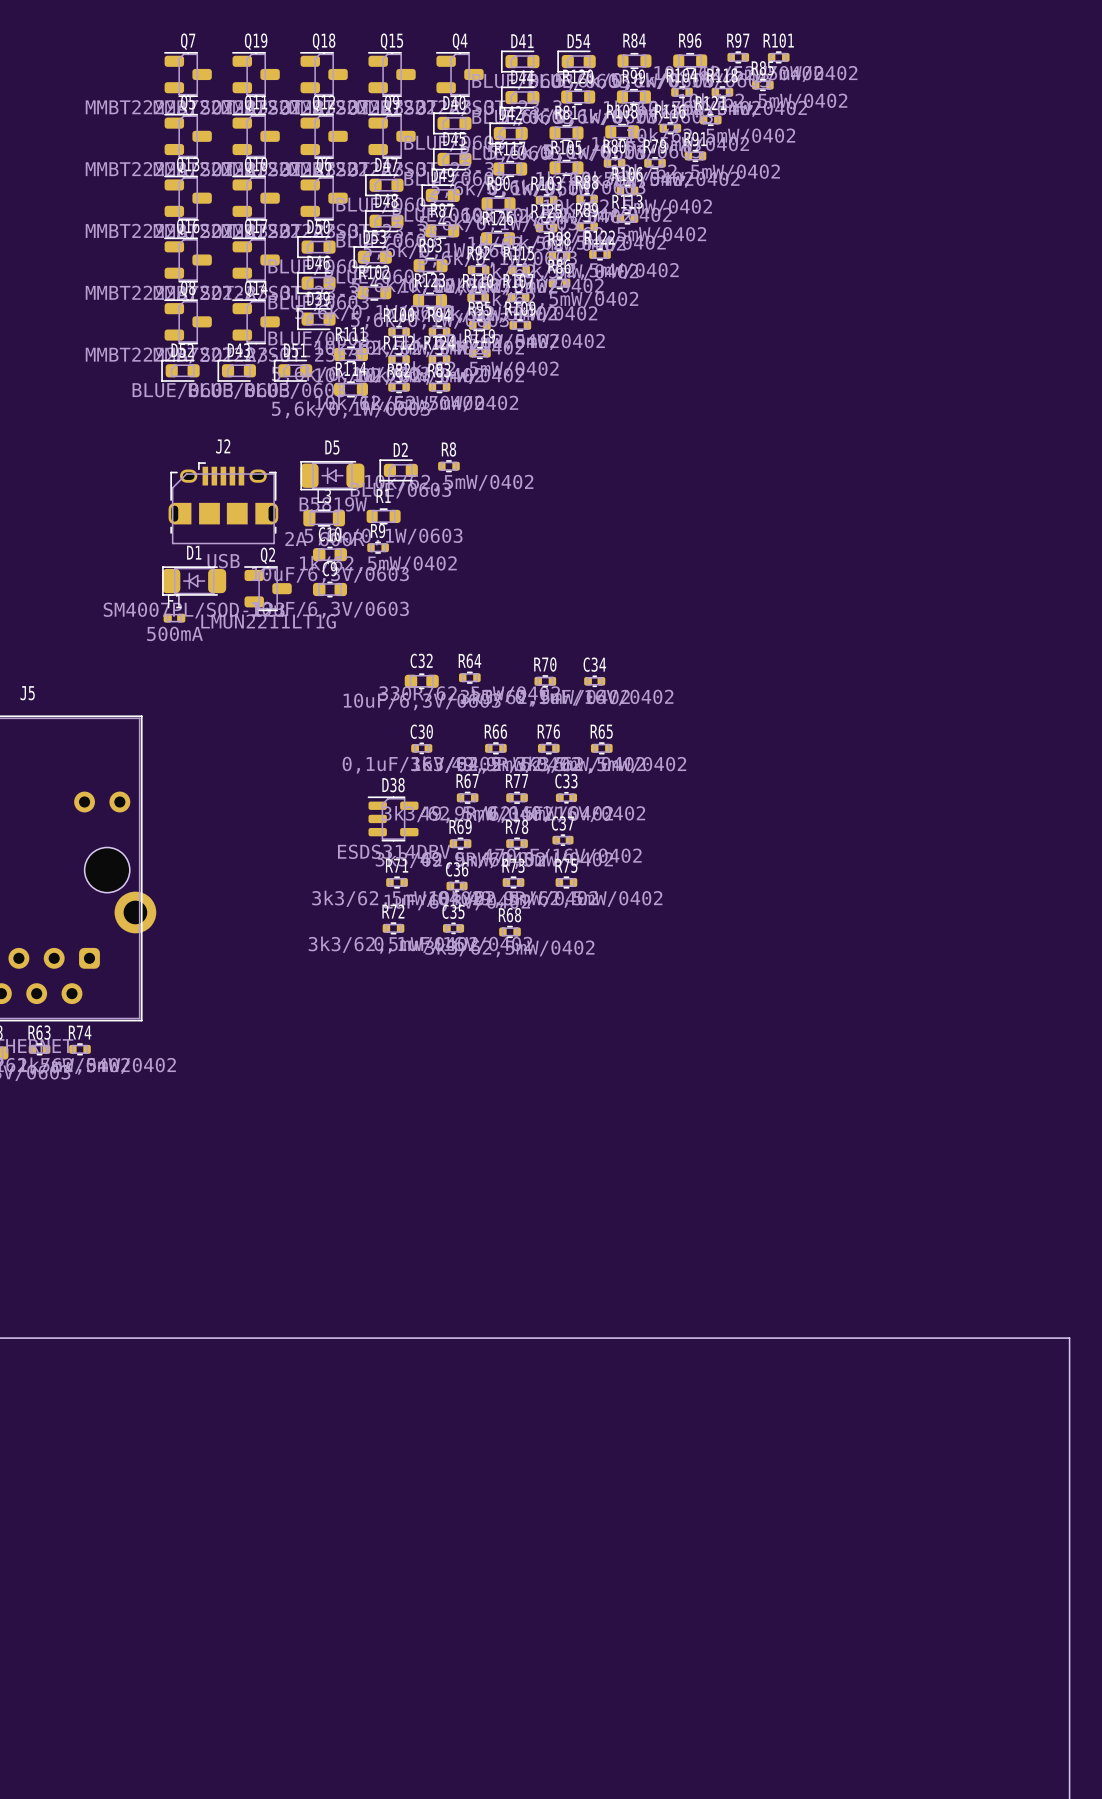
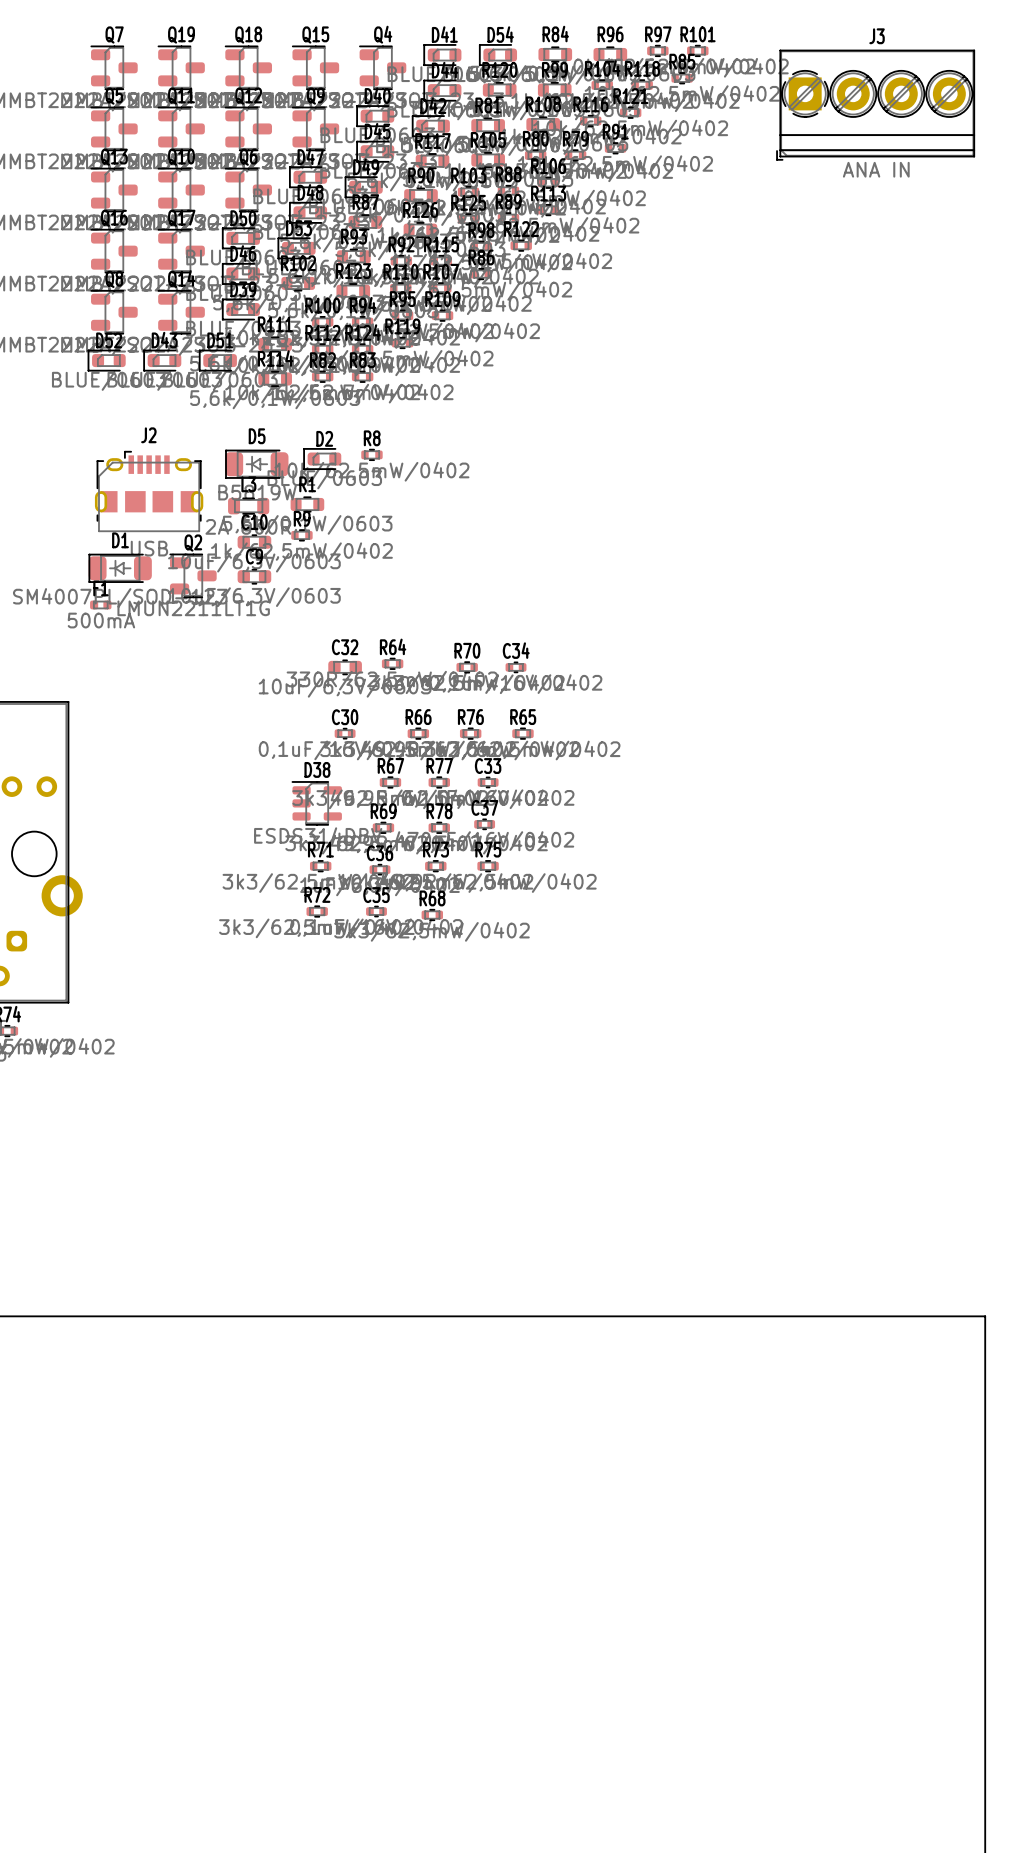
J3: none -> ANA IN (875, 105)

